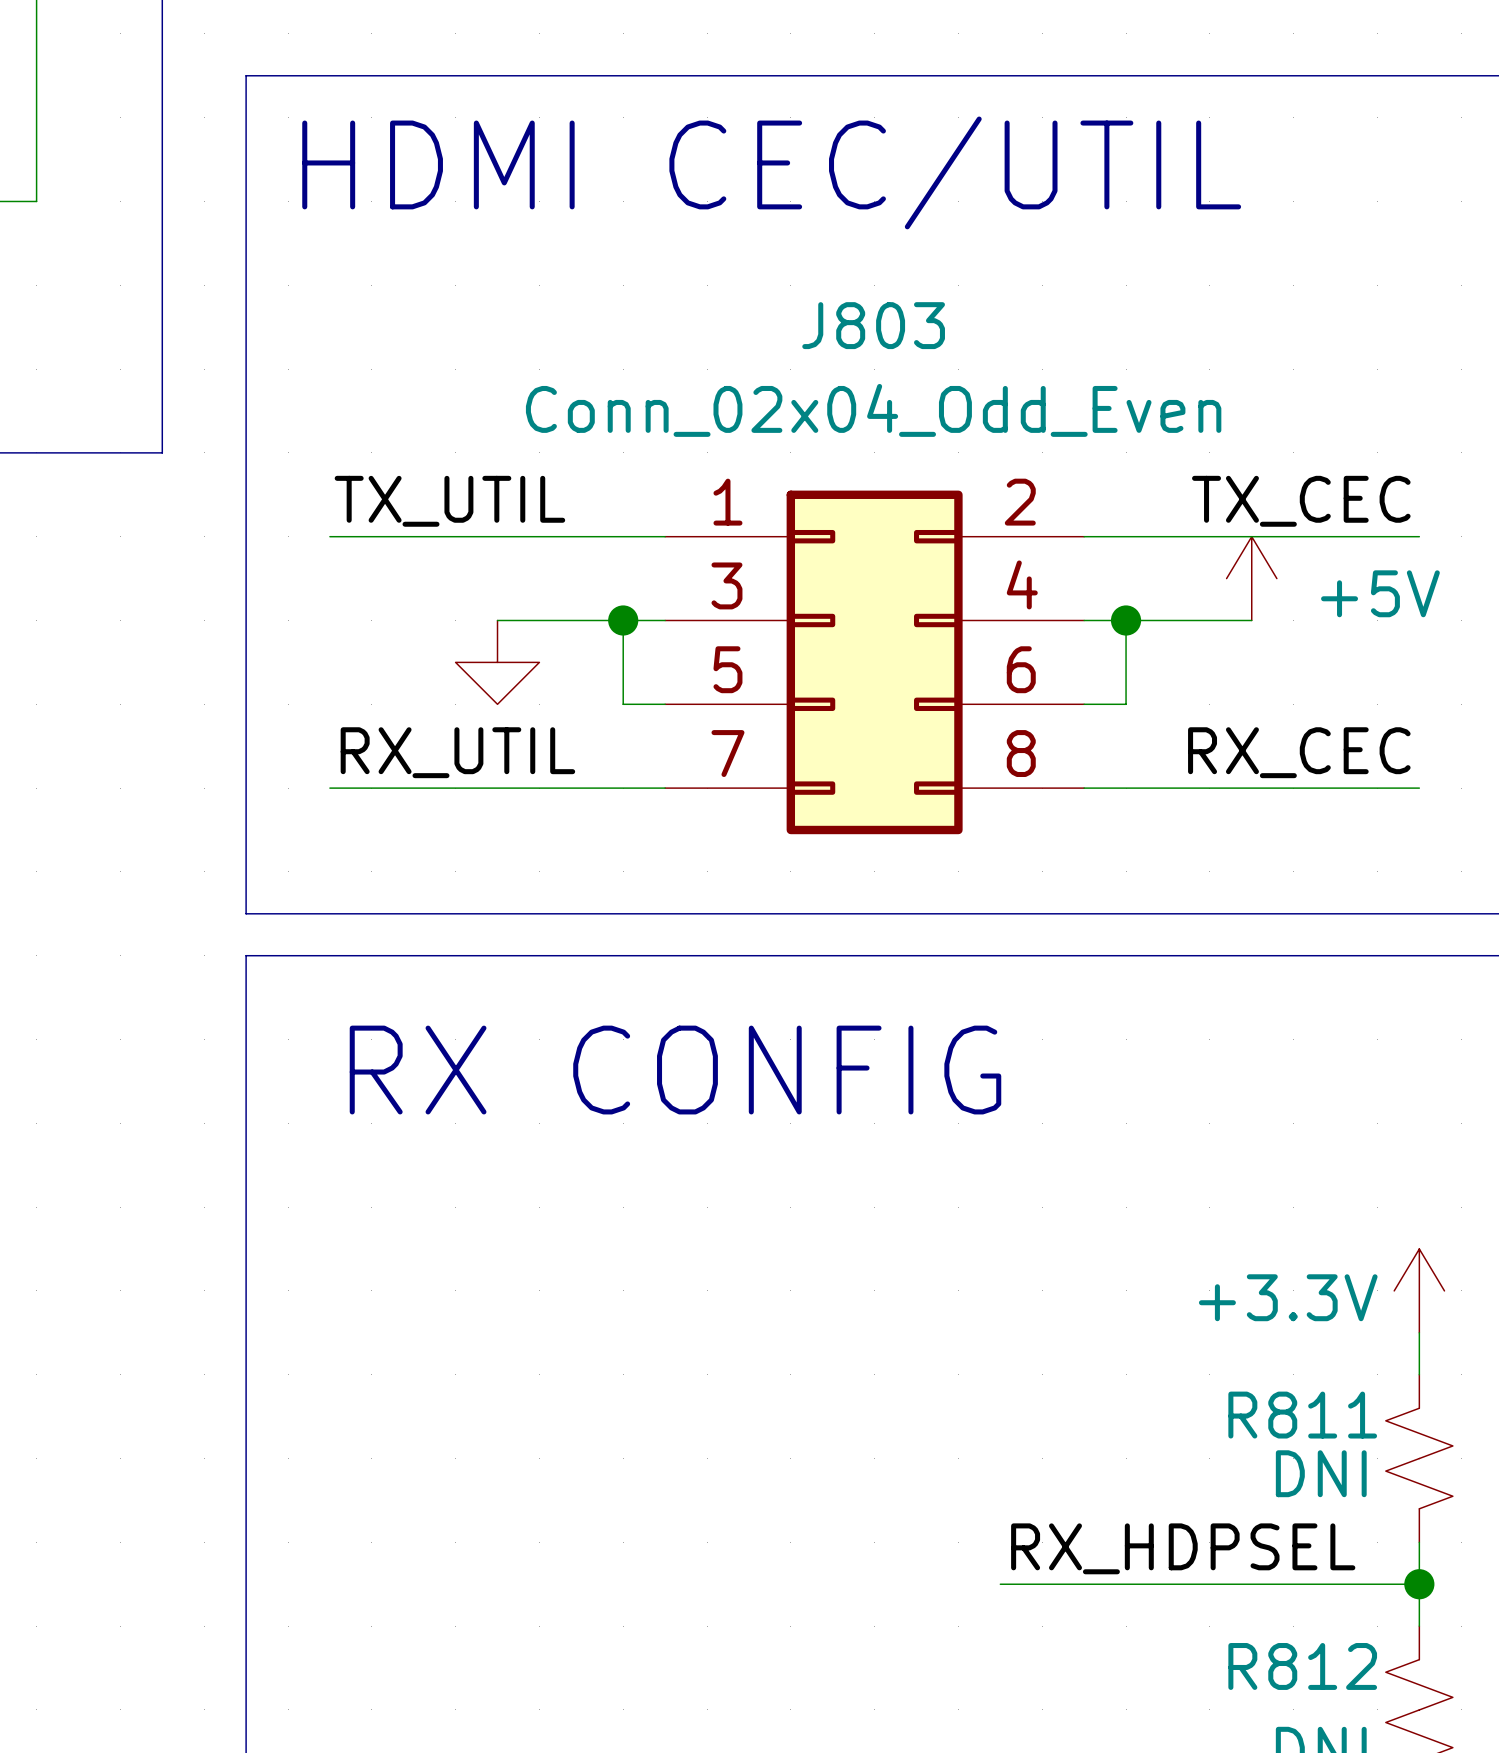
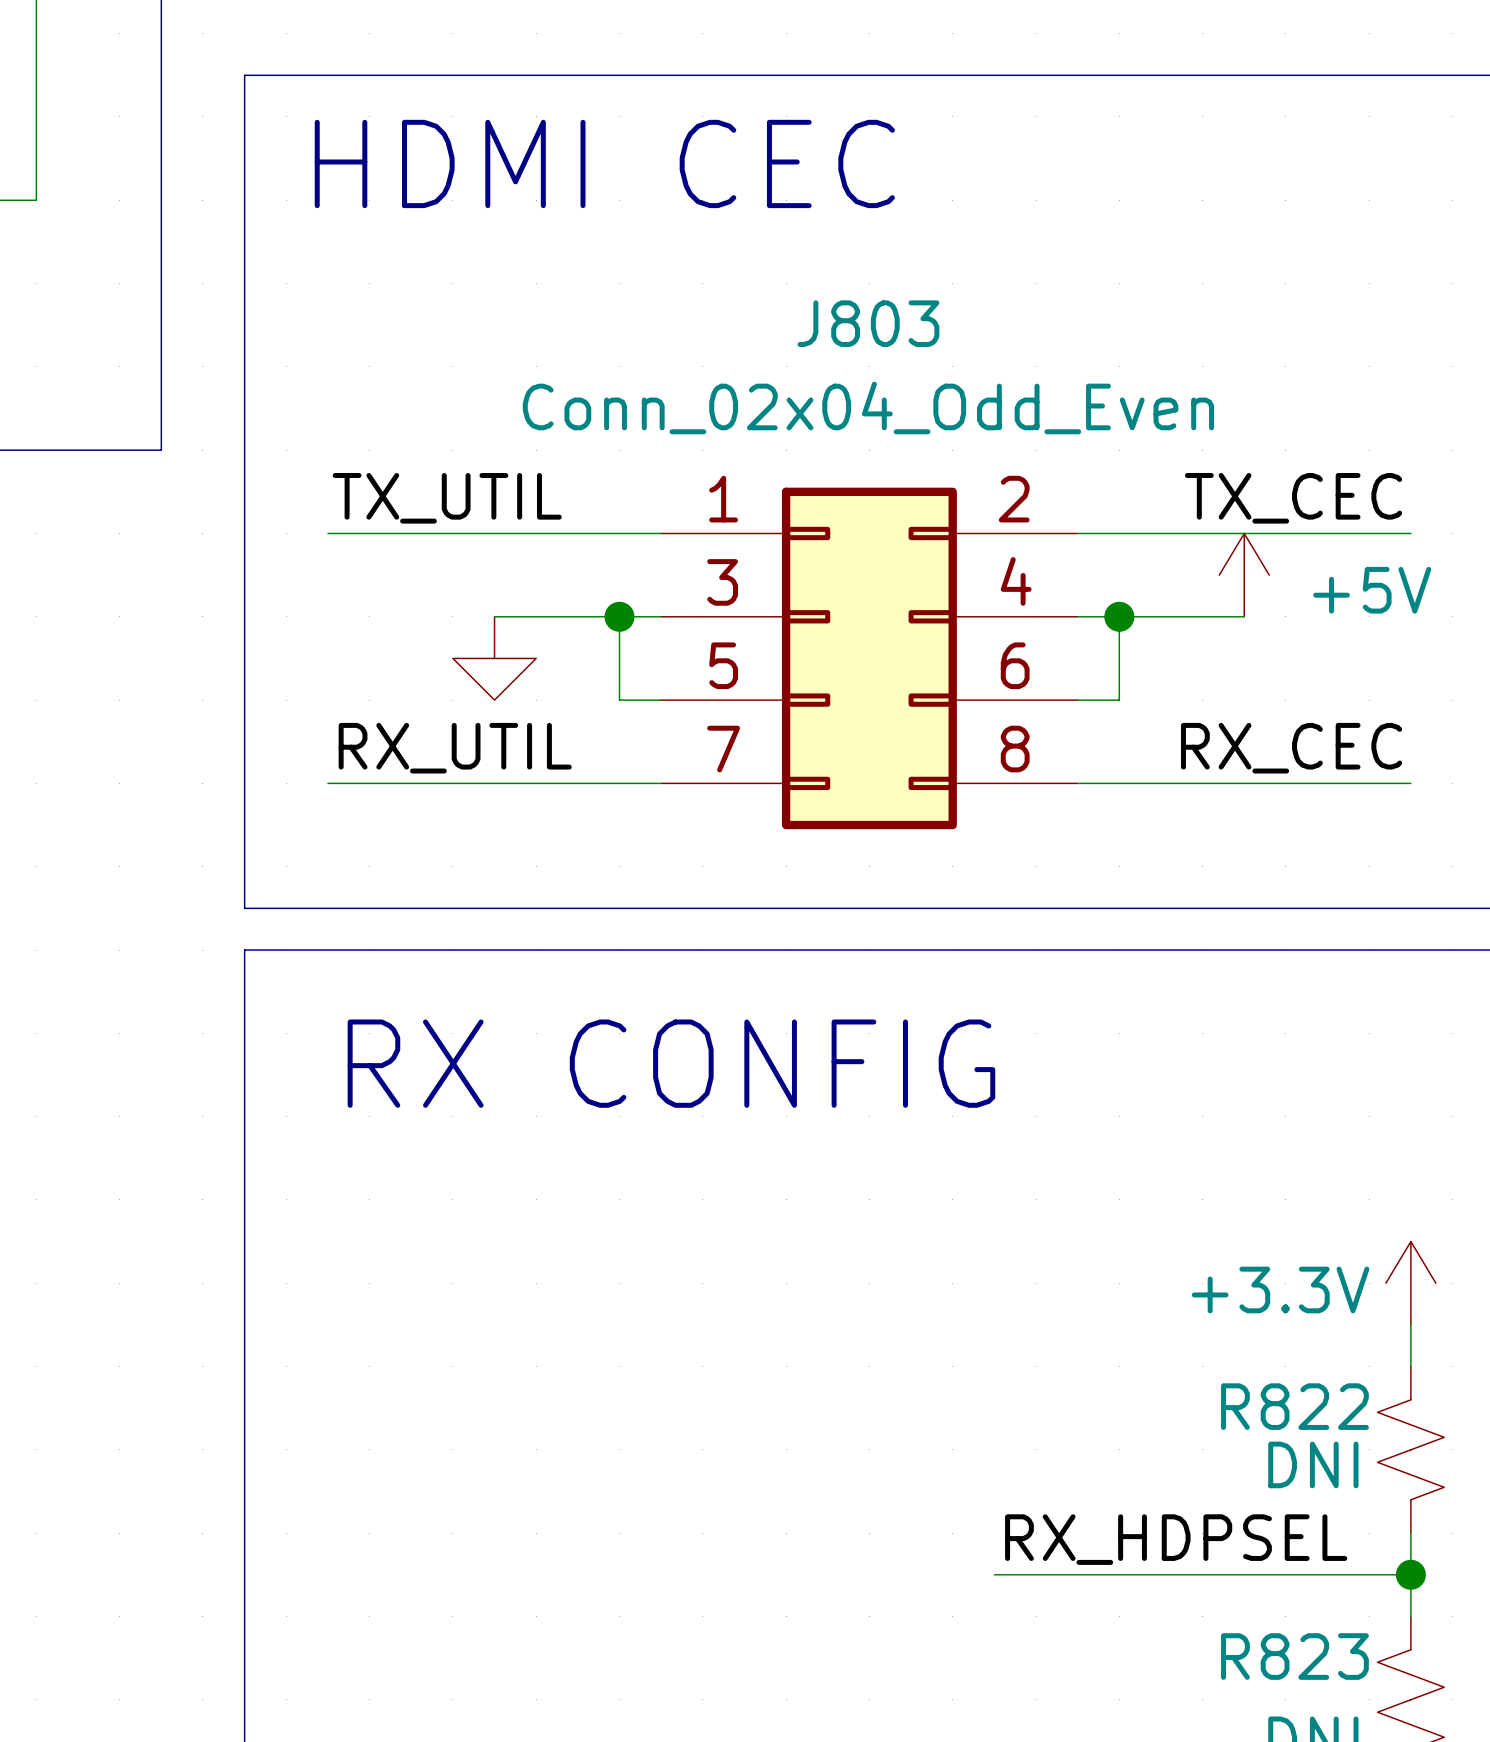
text: HDMI CEC/UTIL (771, 172) -> HDMI CEC (604, 163)
R811 name: R811 (1302, 1415) -> R822 (1294, 1406)
R812 name: R812 (1302, 1666) -> R823 (1294, 1656)

